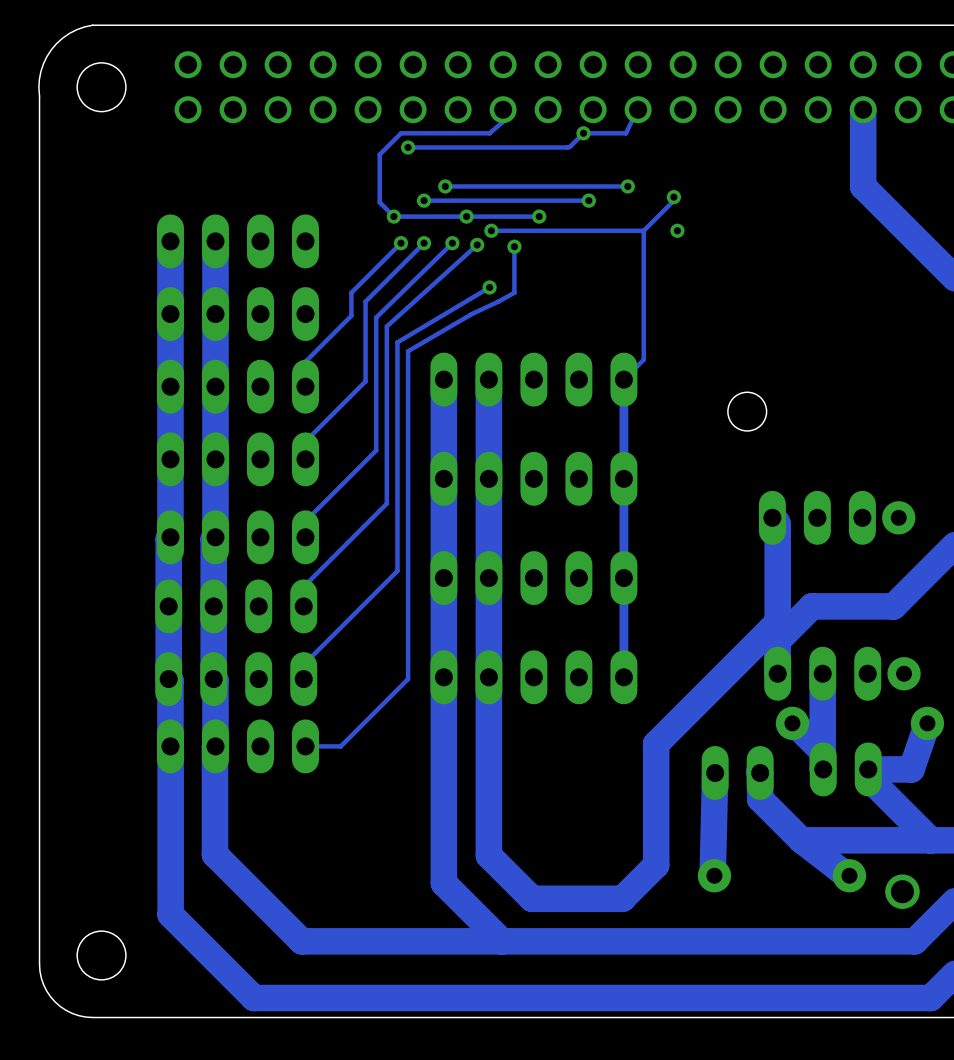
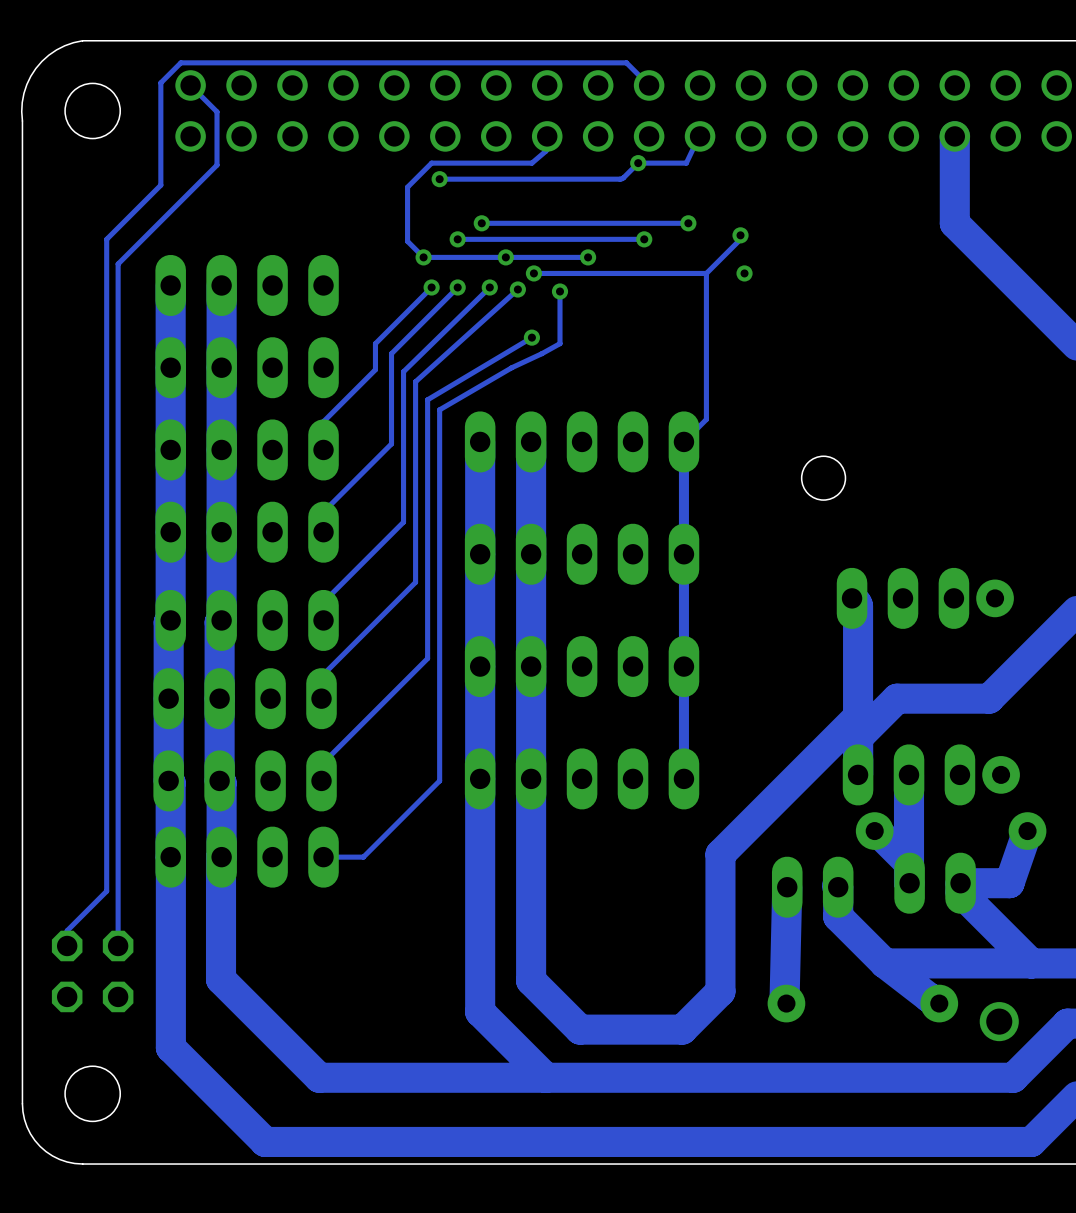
track: none -> (190, 85) (217, 111) (217, 165) (118, 264) (118, 945)
track: none -> (649, 85) (626, 62) (180, 62) (160, 82) (160, 185) (106, 239) (106, 891) (67, 930) (67, 945)
part: none -> (92, 971)

